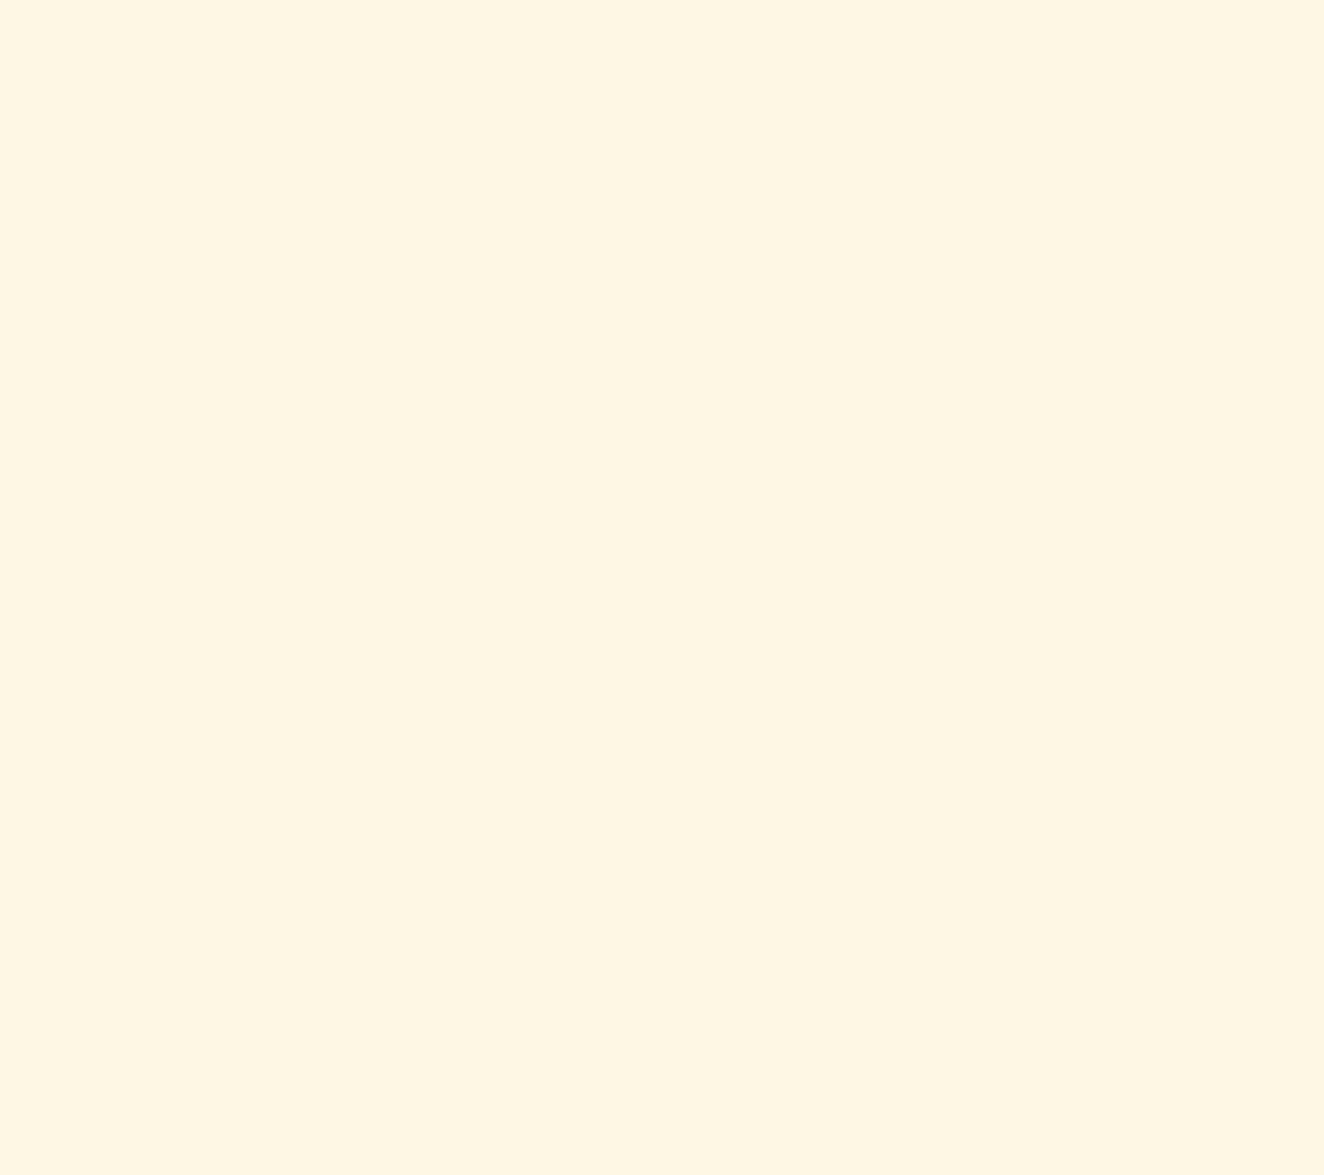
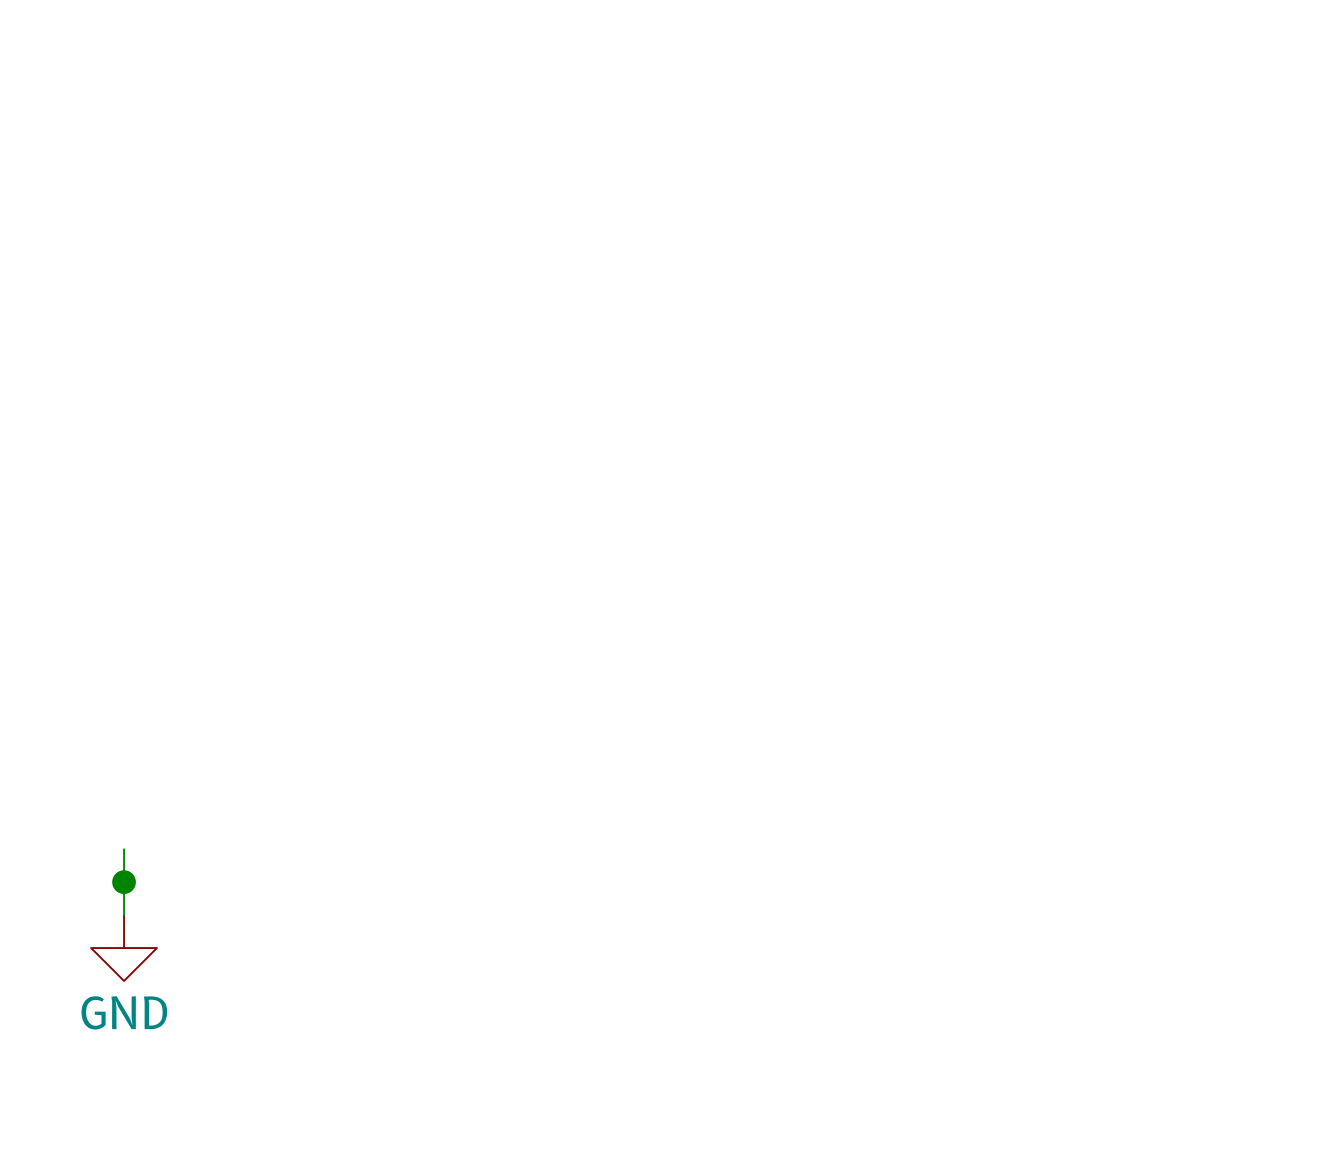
wire: none -> (124, 849) (124, 915)
junction: none -> (124, 882)
power symbol: none -> GND (124, 948)

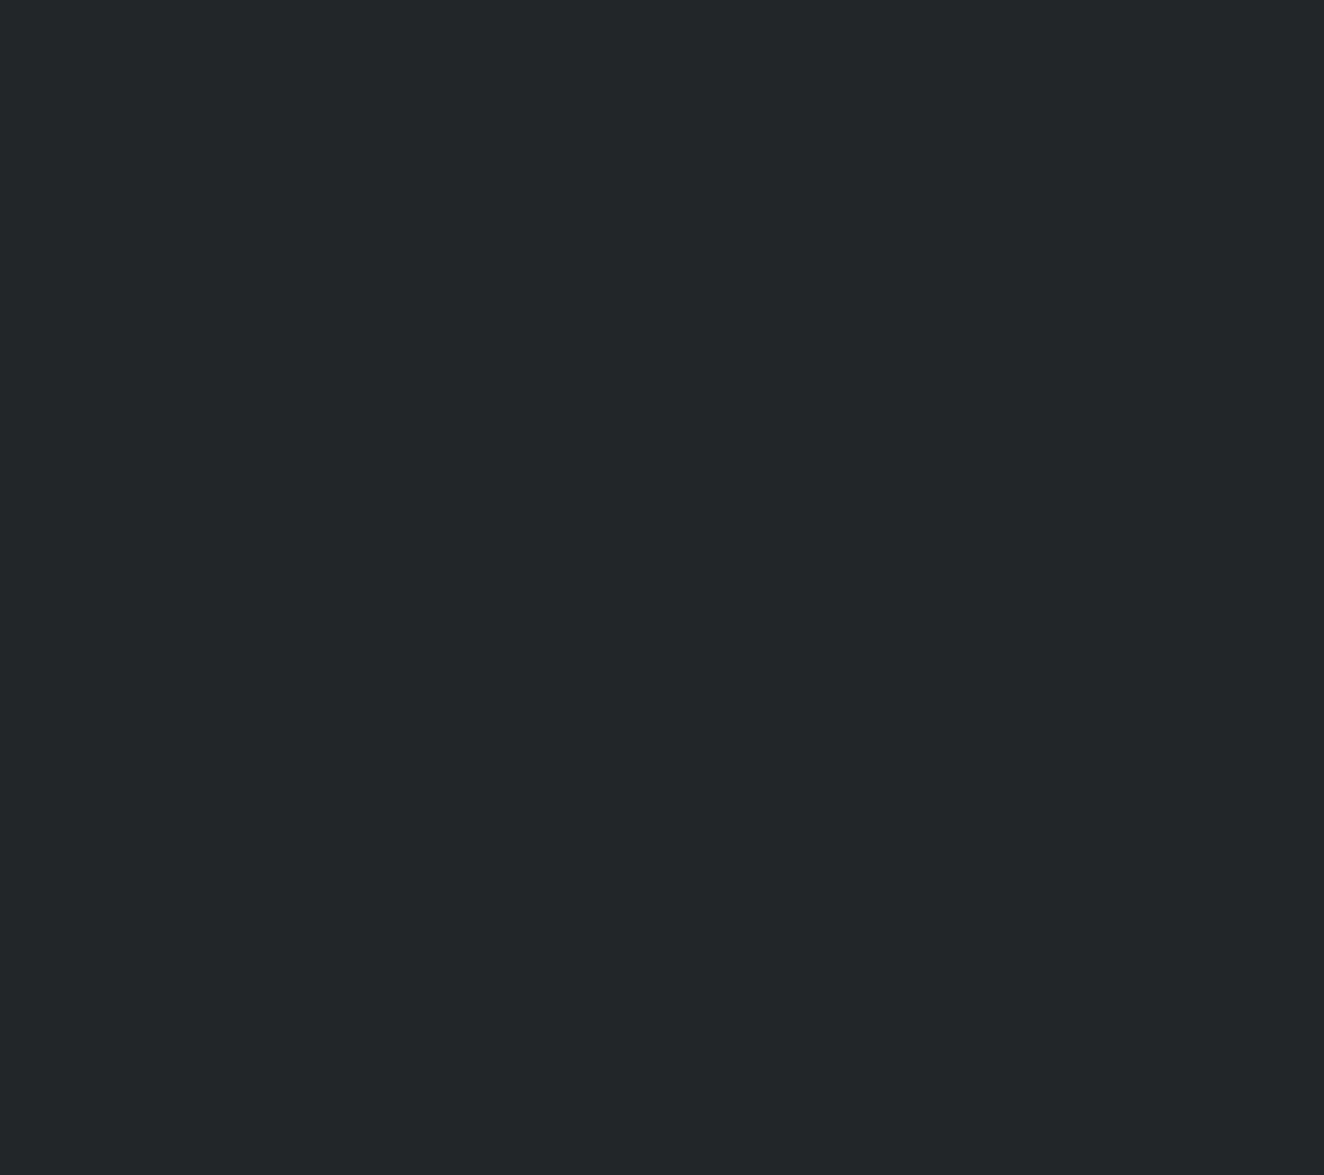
wire: (124, 849) (124, 915) -> none
junction: (124, 882) -> none
power symbol: GND (124, 948) -> none

